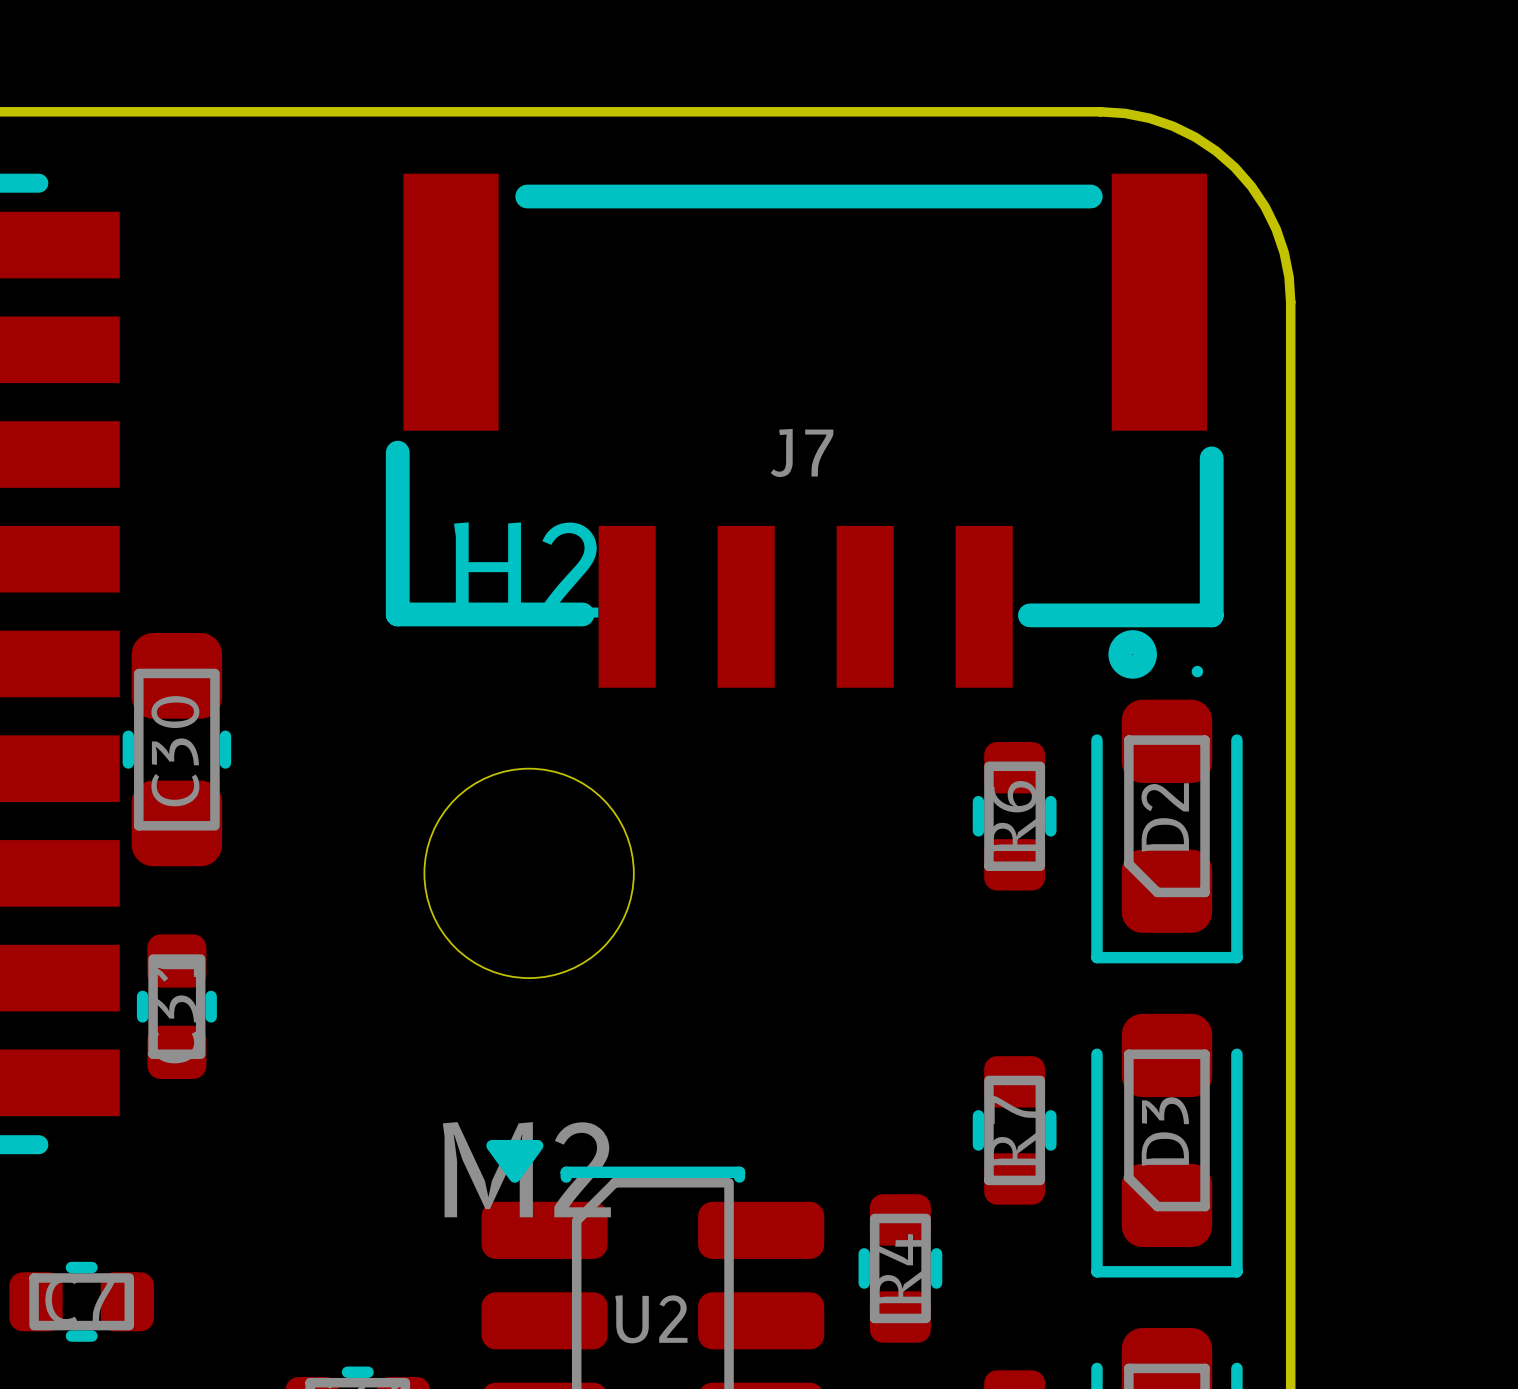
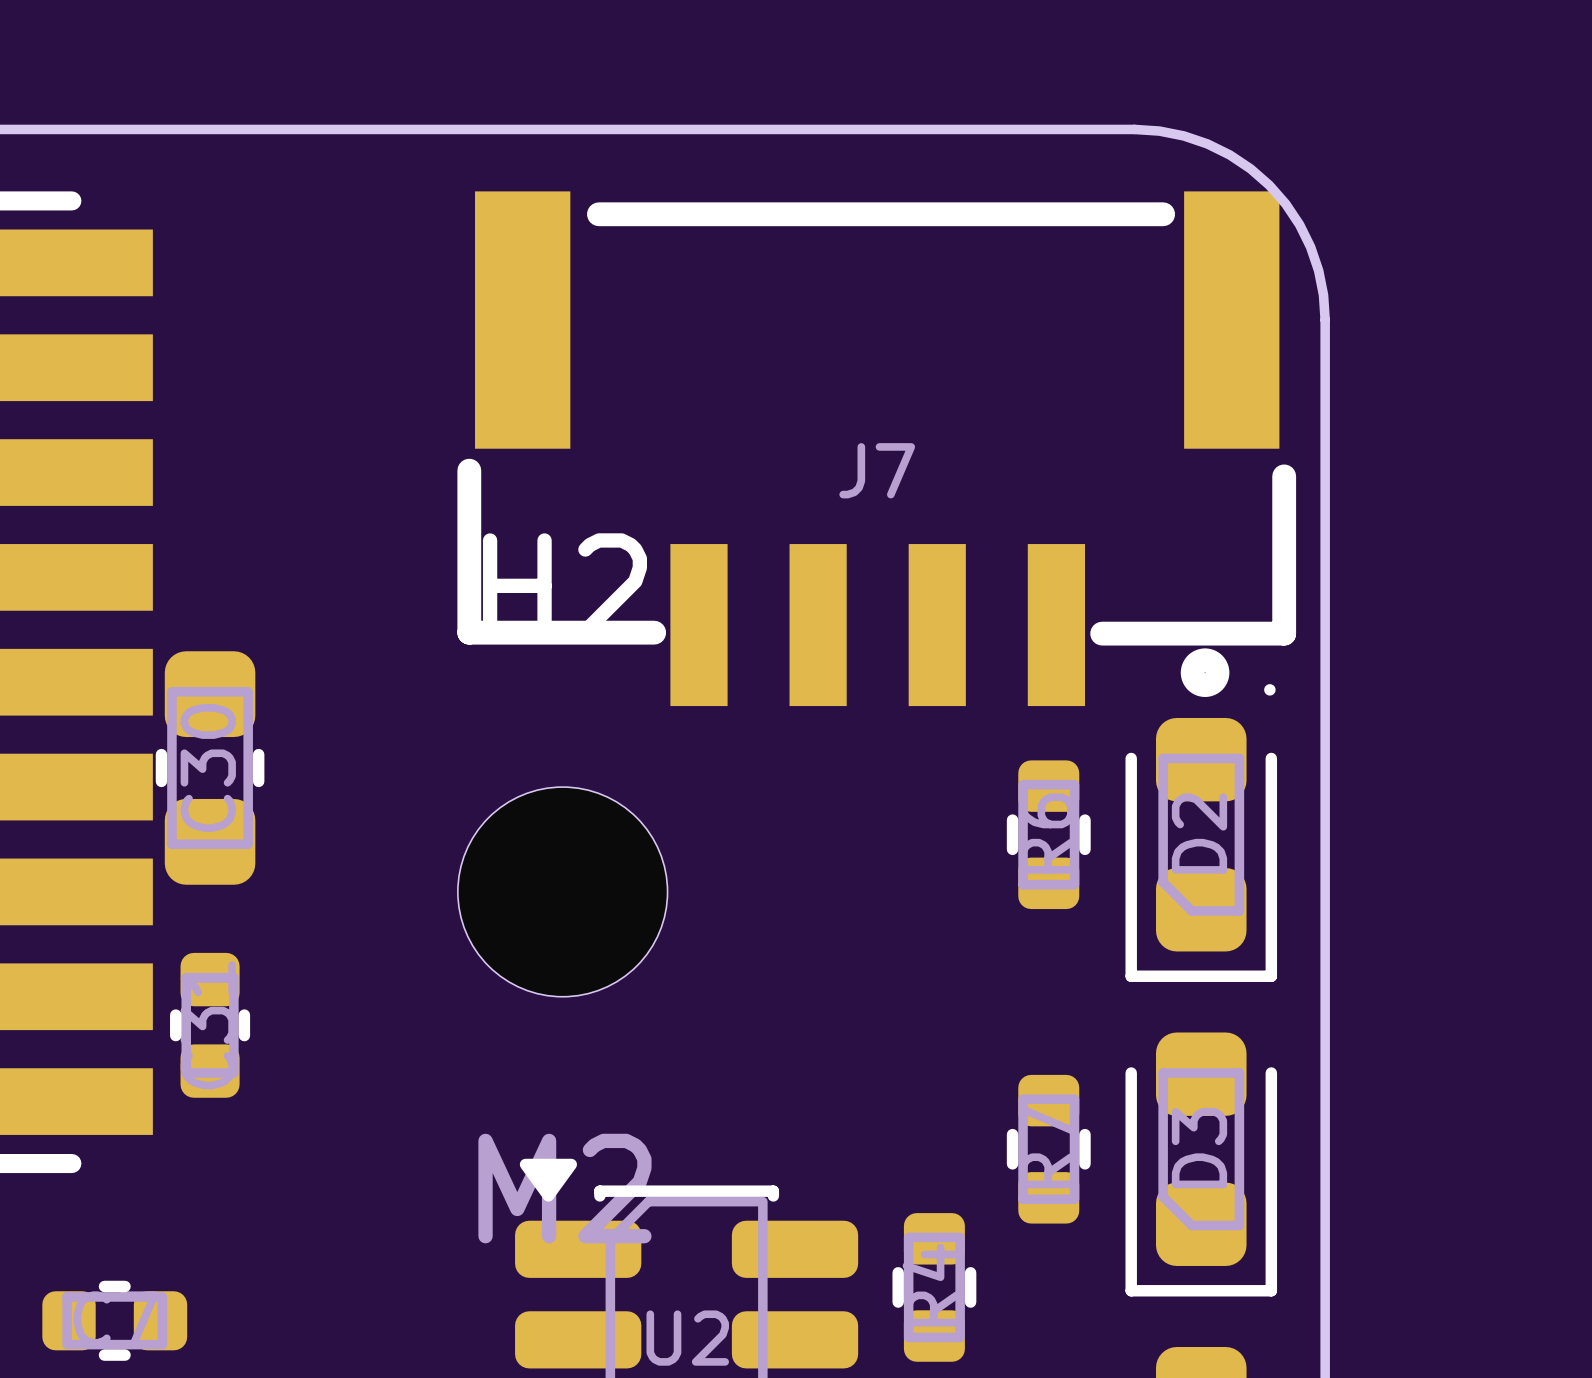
J7 position: (804, 430) -> (876, 448)

